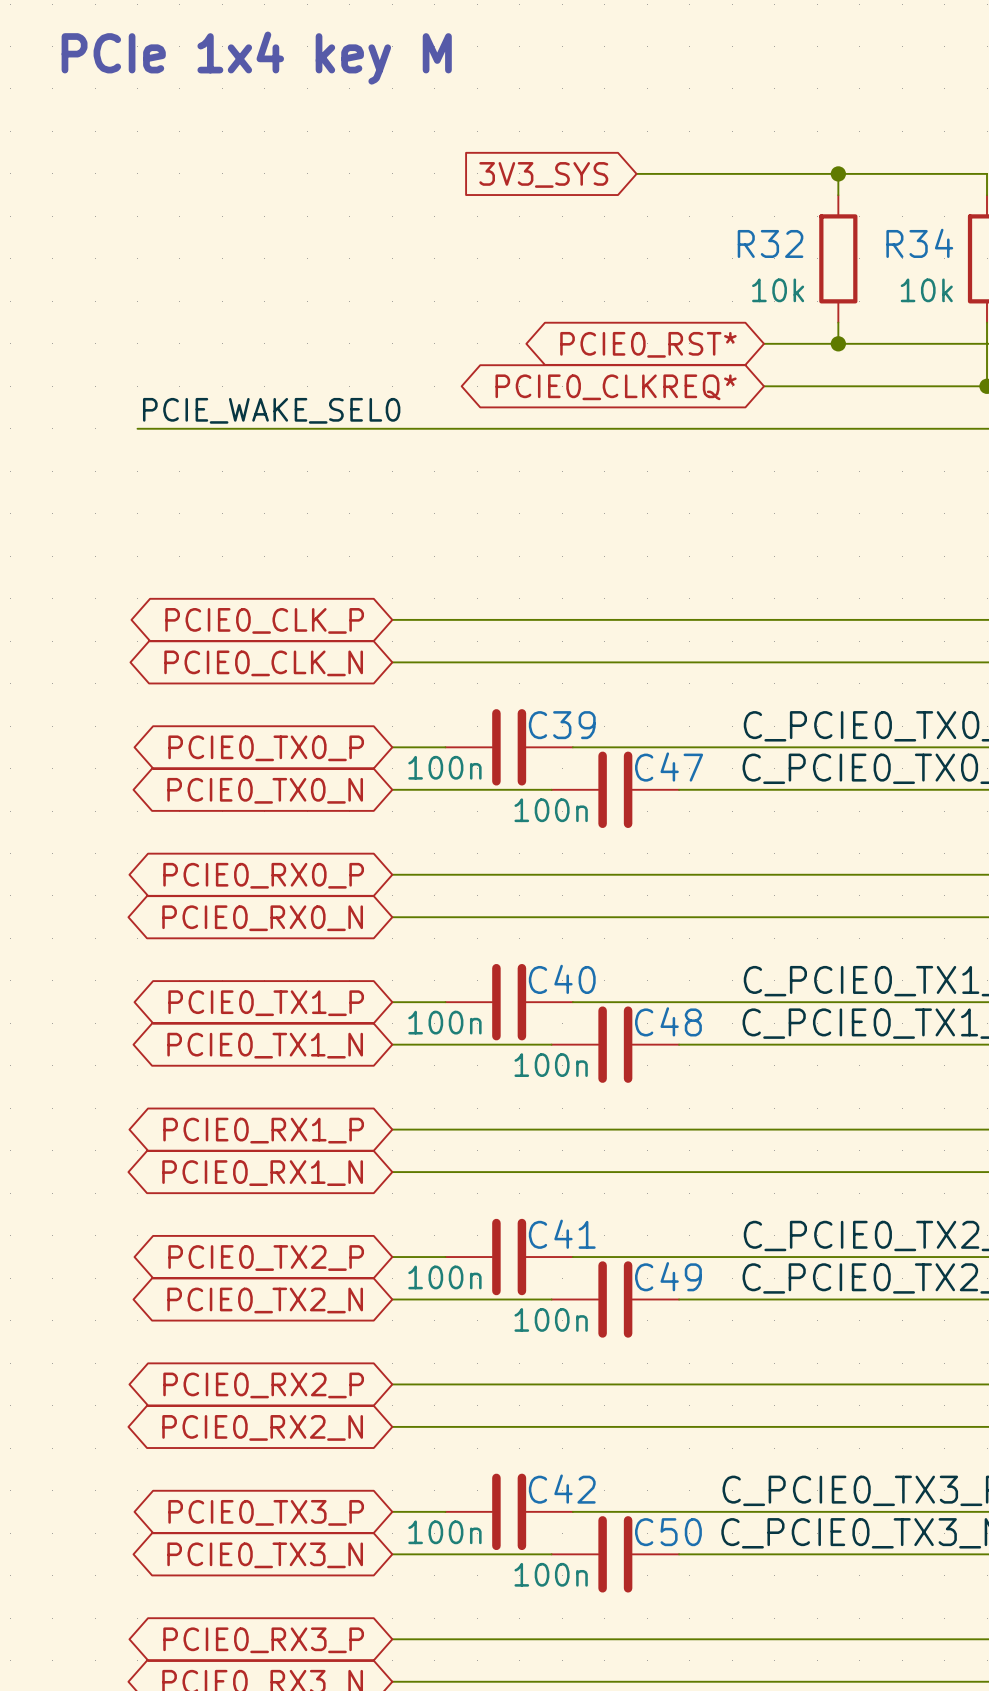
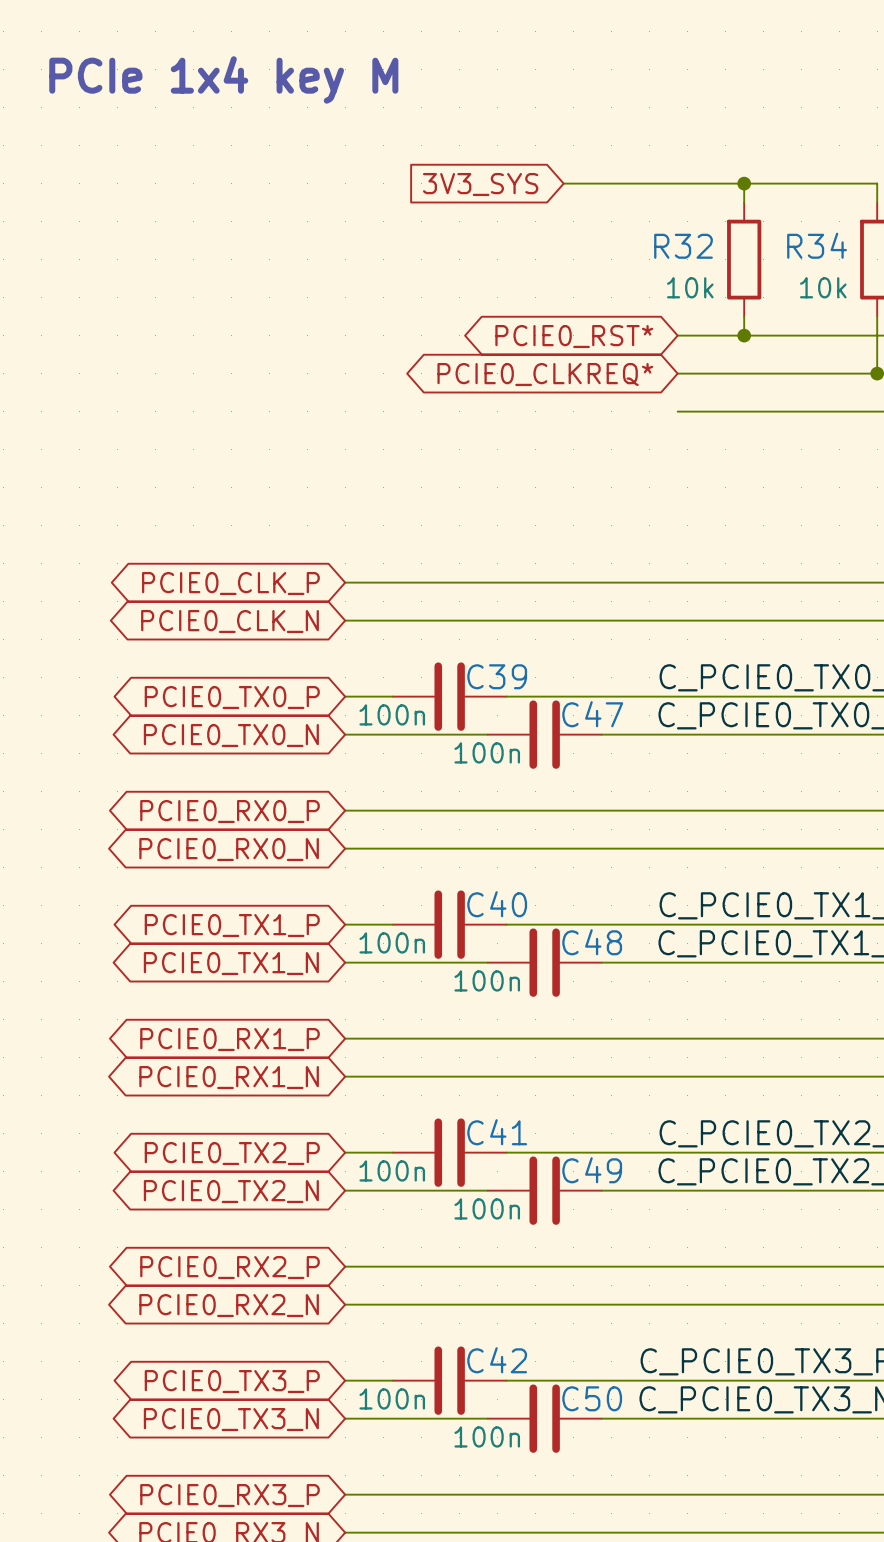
label: PCIE_WAKE_SEL0 (271, 410) -> none
wire: (137, 428) (764, 428) -> none

